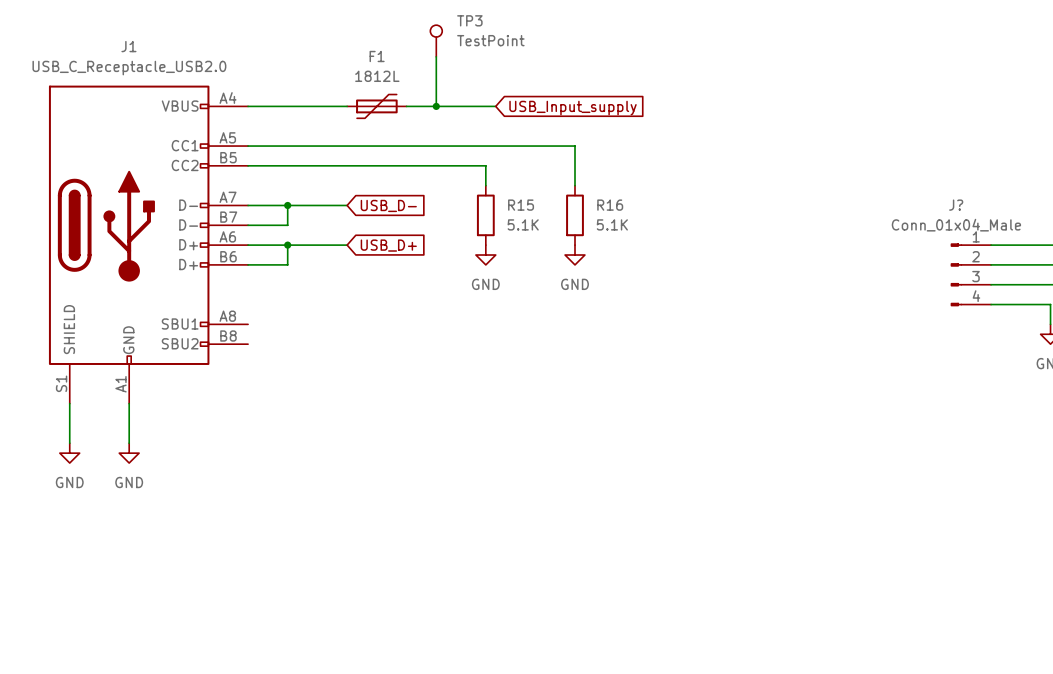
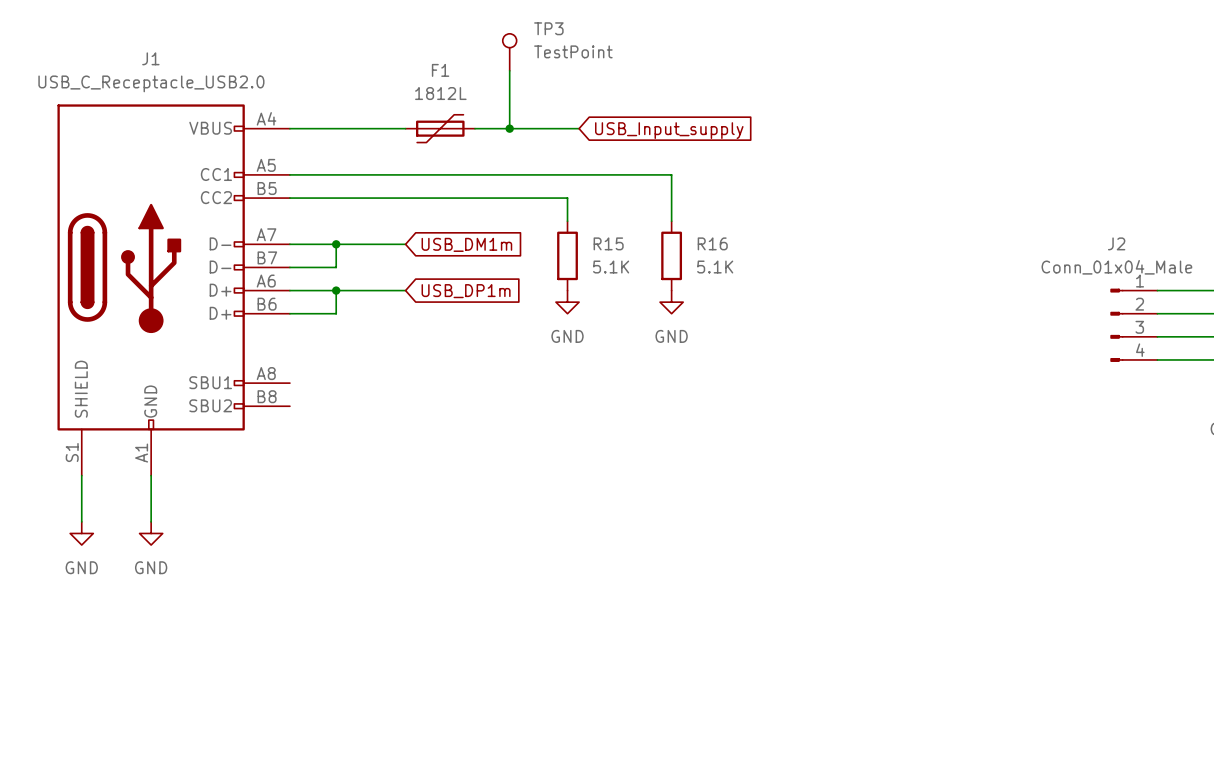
global label: USB_D- (388, 205) -> USB_DM1m (466, 244)
J? name: J? (956, 205) -> J2 (1116, 243)
global label: USB_D+ (388, 245) -> USB_DP1m (466, 291)

